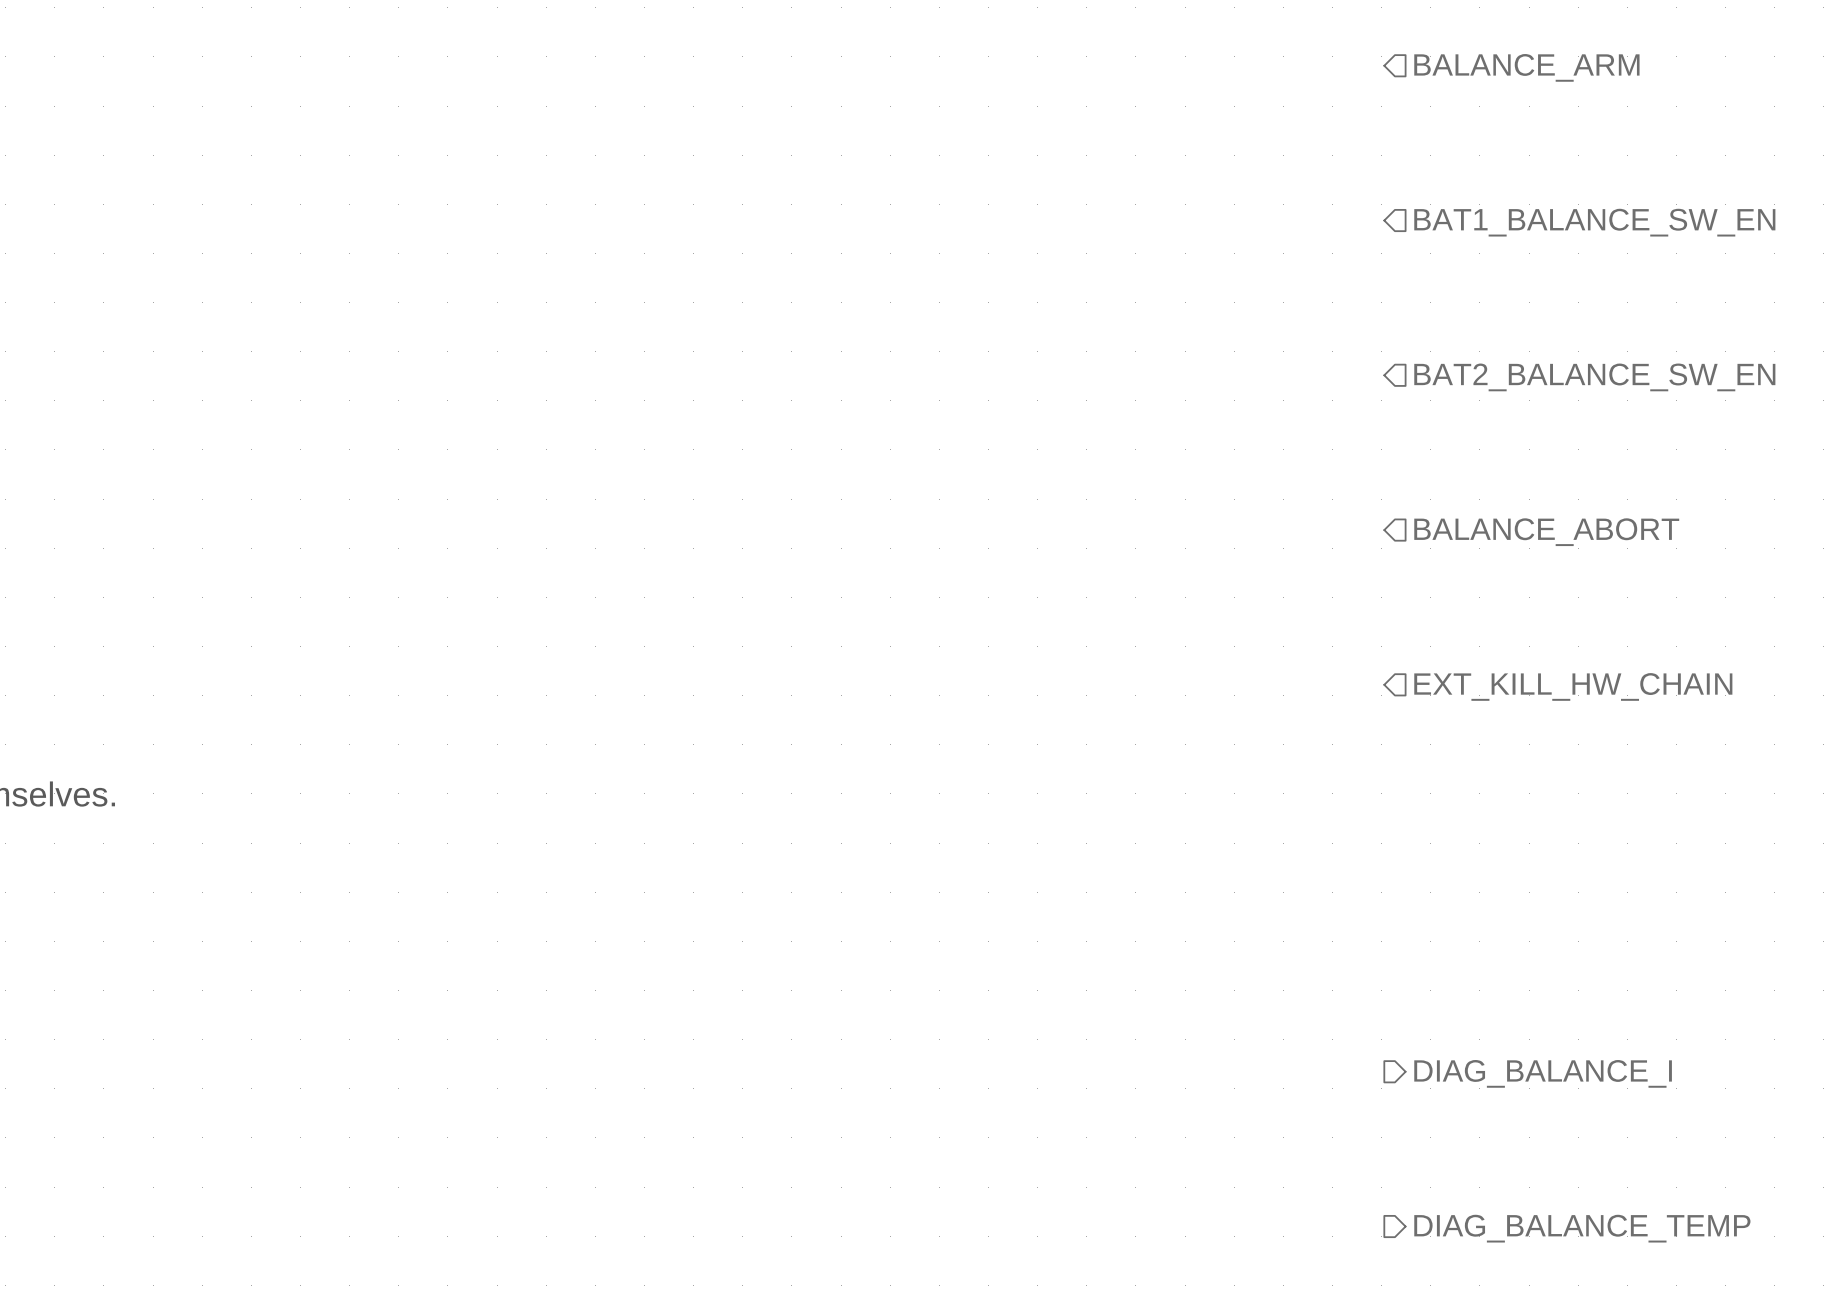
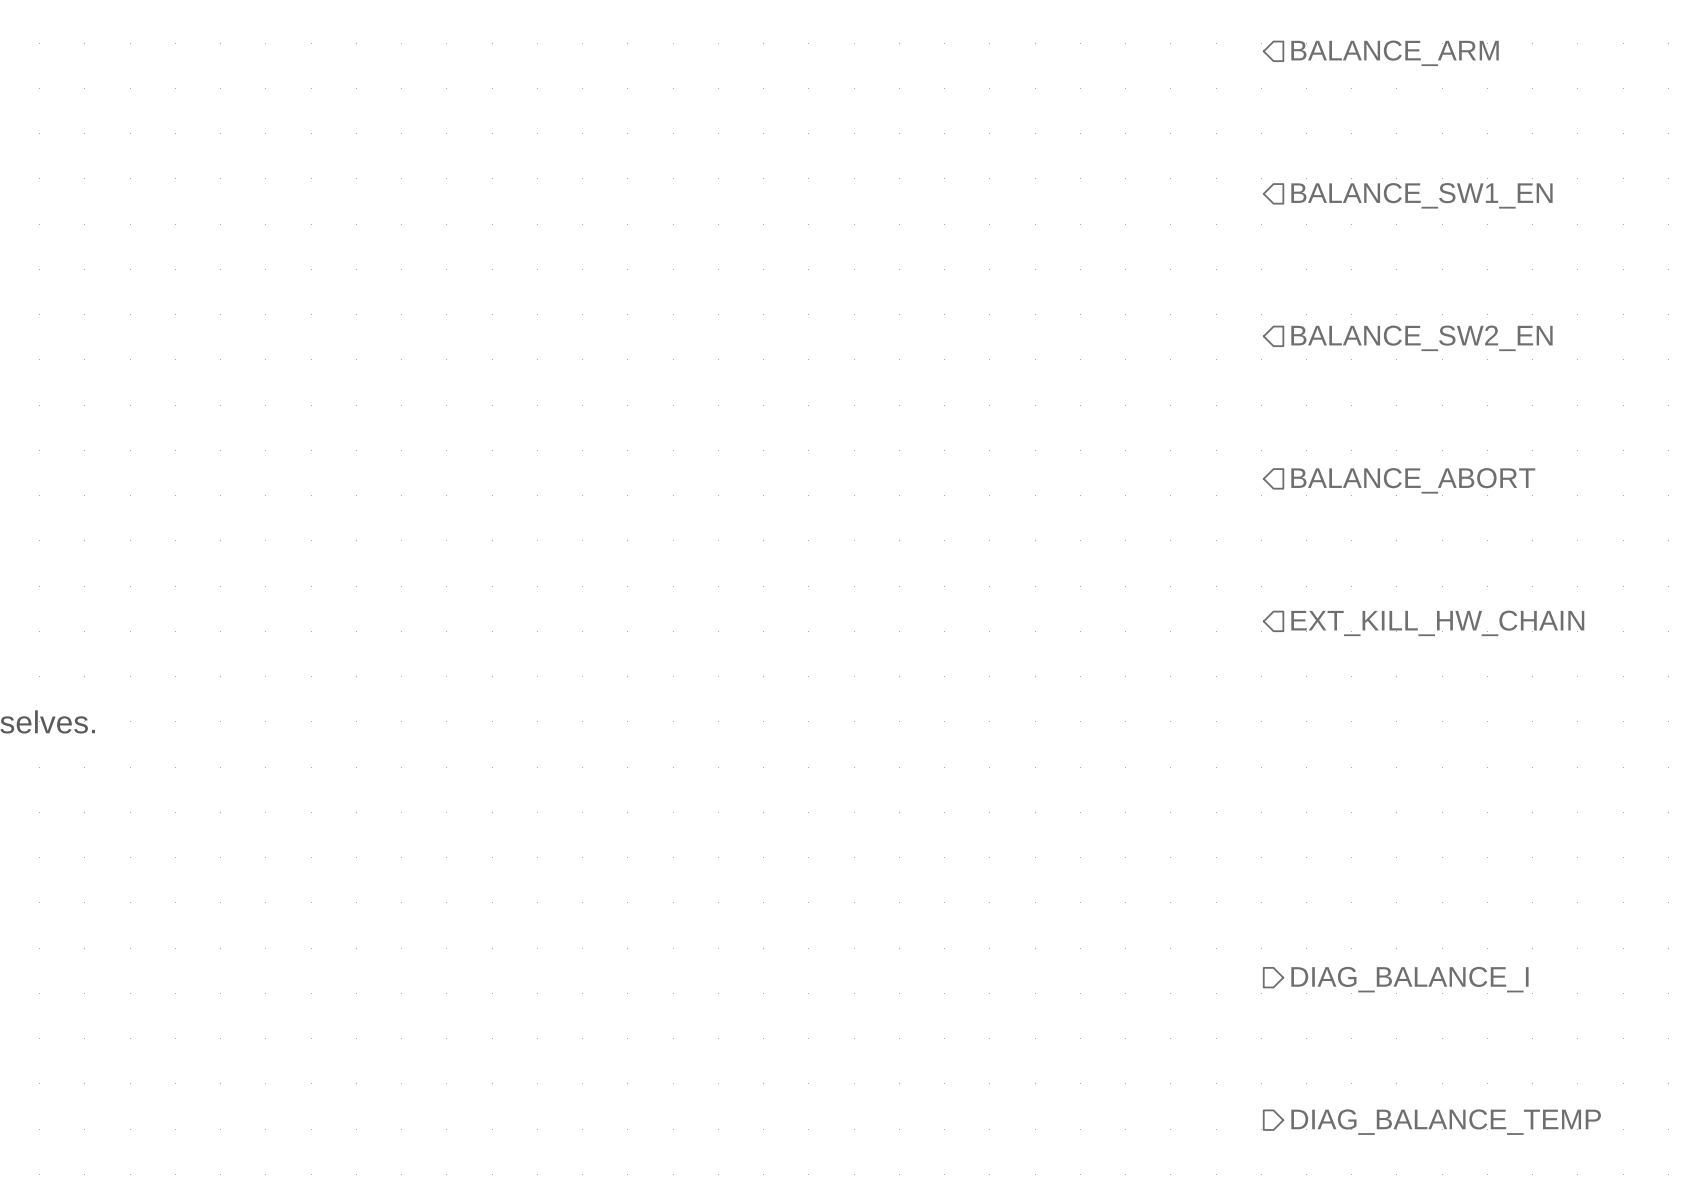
hierarchical label: BAT1_BALANCE_SW_EN (1594, 222) -> BALANCE_SW1_EN (1421, 195)
hierarchical label: BAT2_BALANCE_SW_EN (1594, 377) -> BALANCE_SW2_EN (1421, 338)

